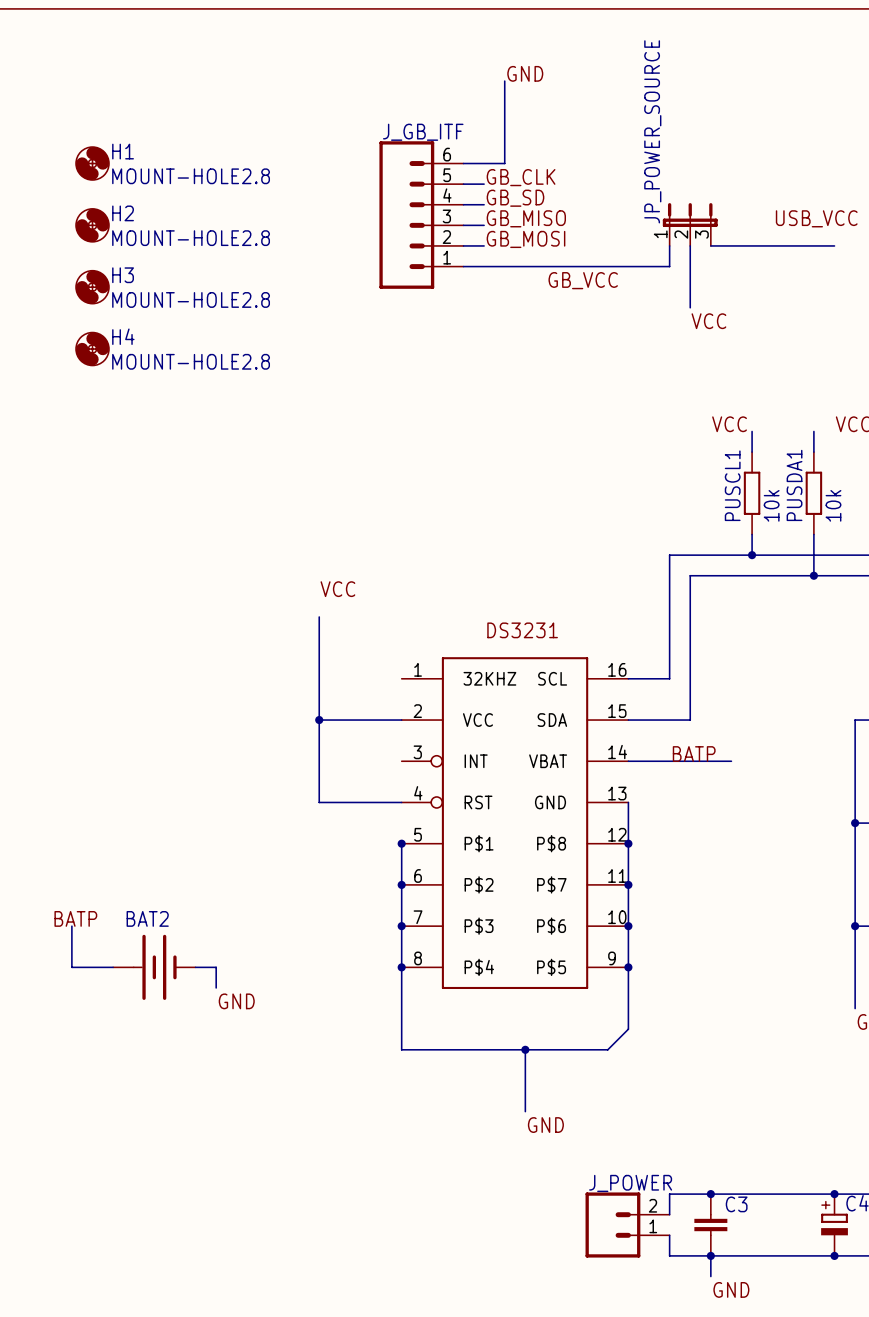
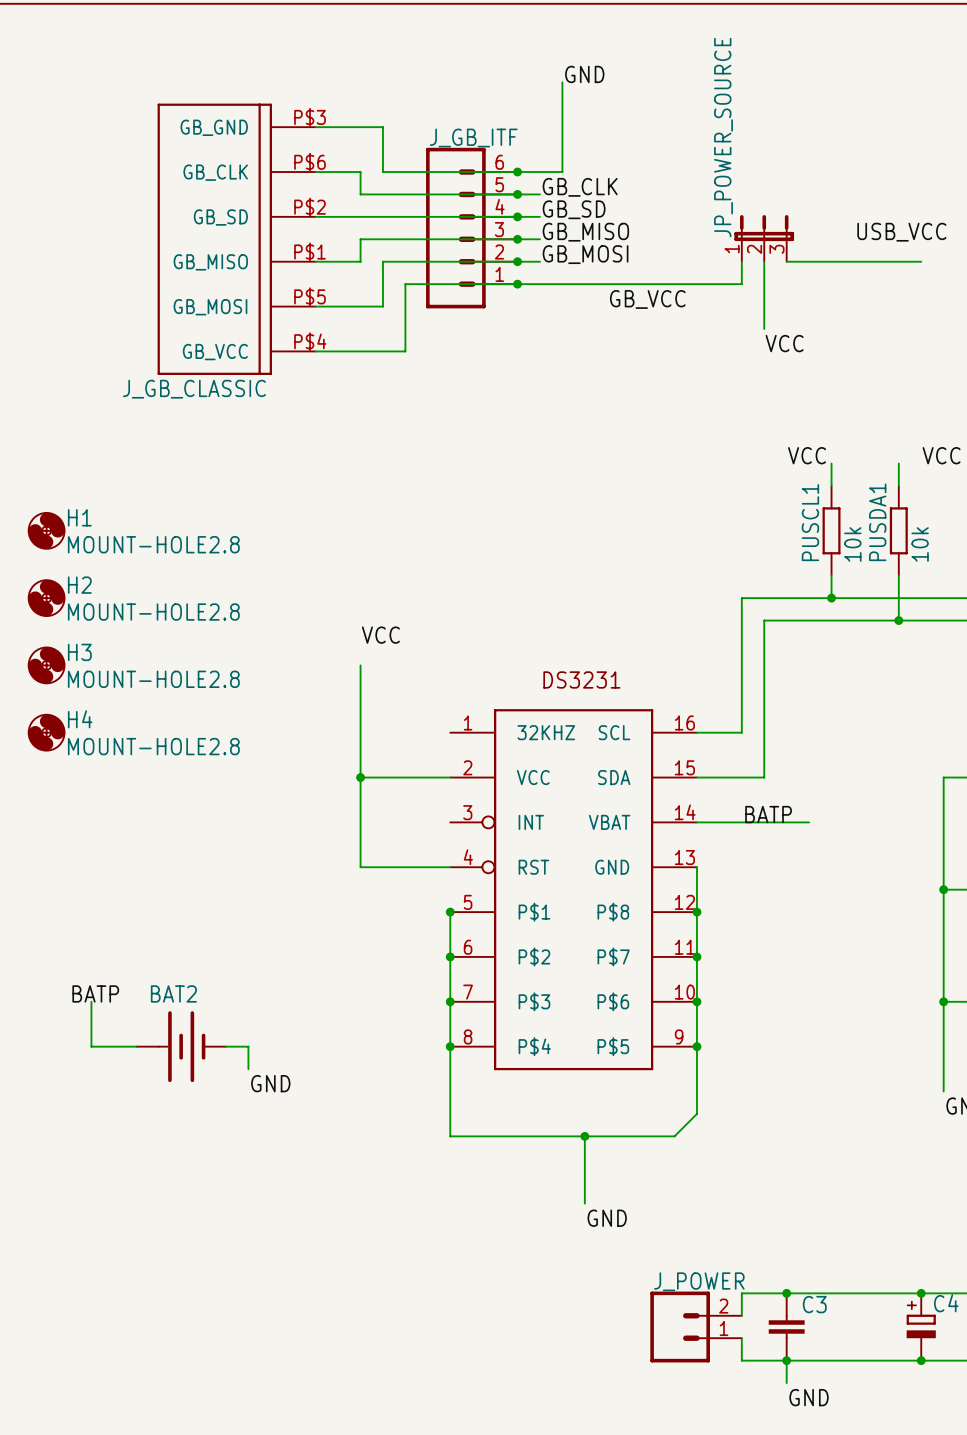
wire: none -> (315, 127) (382, 127) (382, 172) (517, 172)
H1 position: (92, 163) -> (46, 530)
wire: none -> (315, 172) (360, 172) (360, 194) (517, 194)
junction: none -> (517, 172)
junction: none -> (517, 194)
wire: none -> (315, 216) (517, 216)
junction: none -> (517, 216)
H2 position: (92, 225) -> (46, 598)
J_GB_CLASSIC: none -> (236, 239)
wire: none -> (517, 239) (360, 239) (360, 261) (315, 261)
junction: none -> (517, 239)
wire: none -> (517, 261) (382, 261) (382, 306) (315, 306)
junction: none -> (517, 261)
wire: none -> (517, 284) (405, 284) (405, 351) (315, 351)
junction: none -> (517, 284)
H3 position: (92, 287) -> (46, 665)
H4 position: (92, 349) -> (46, 732)

